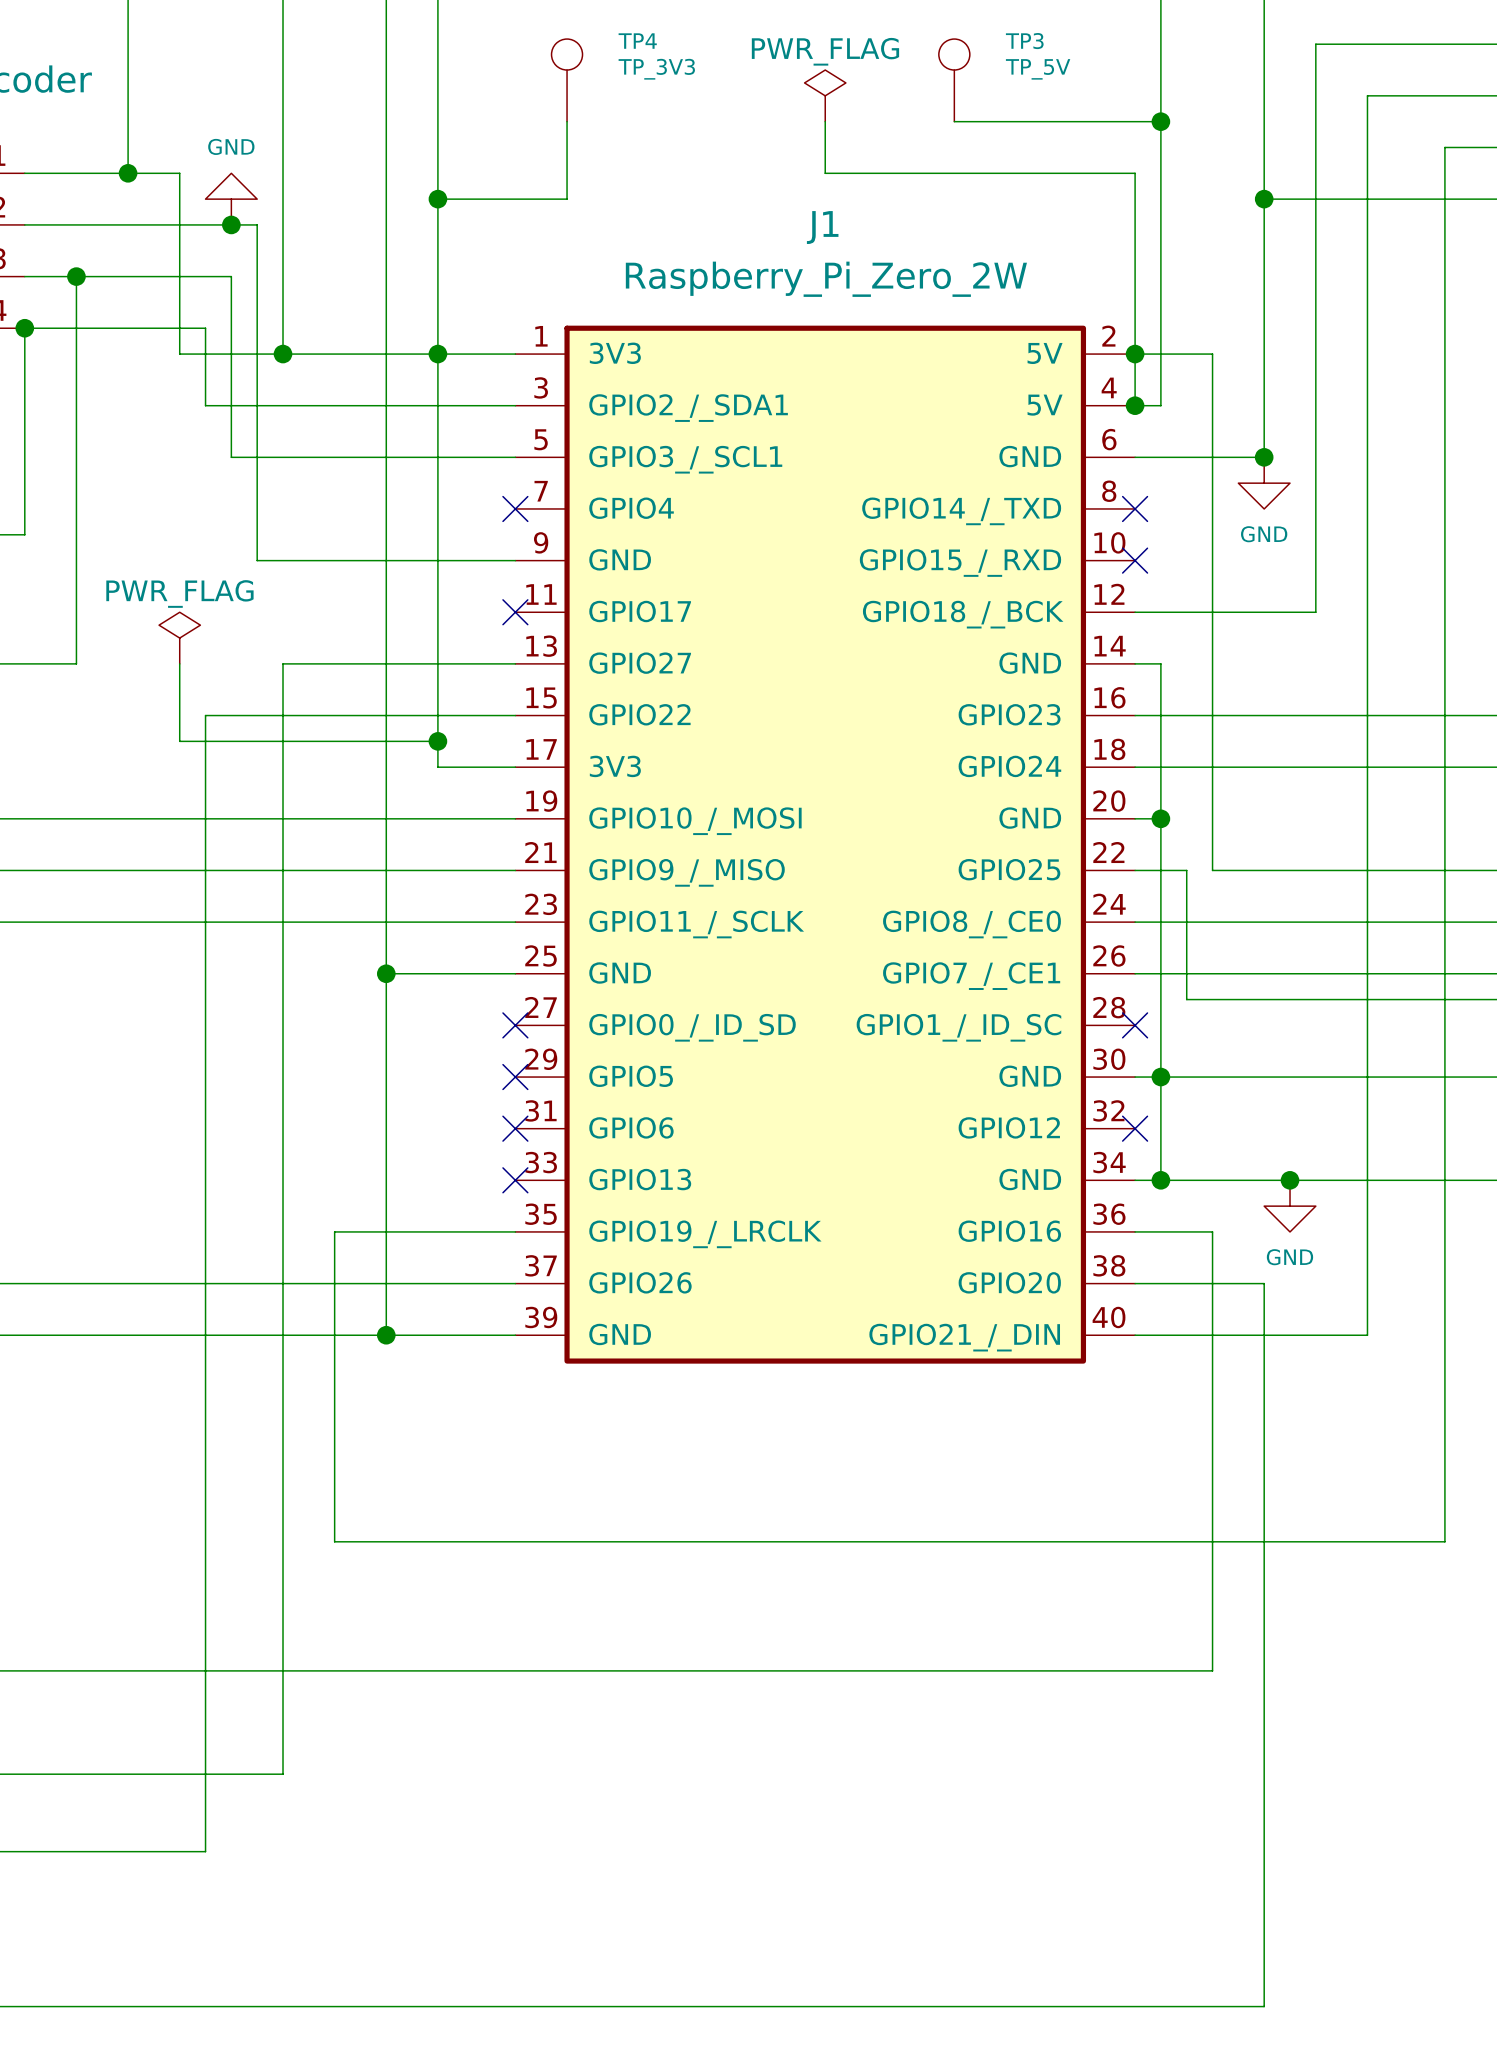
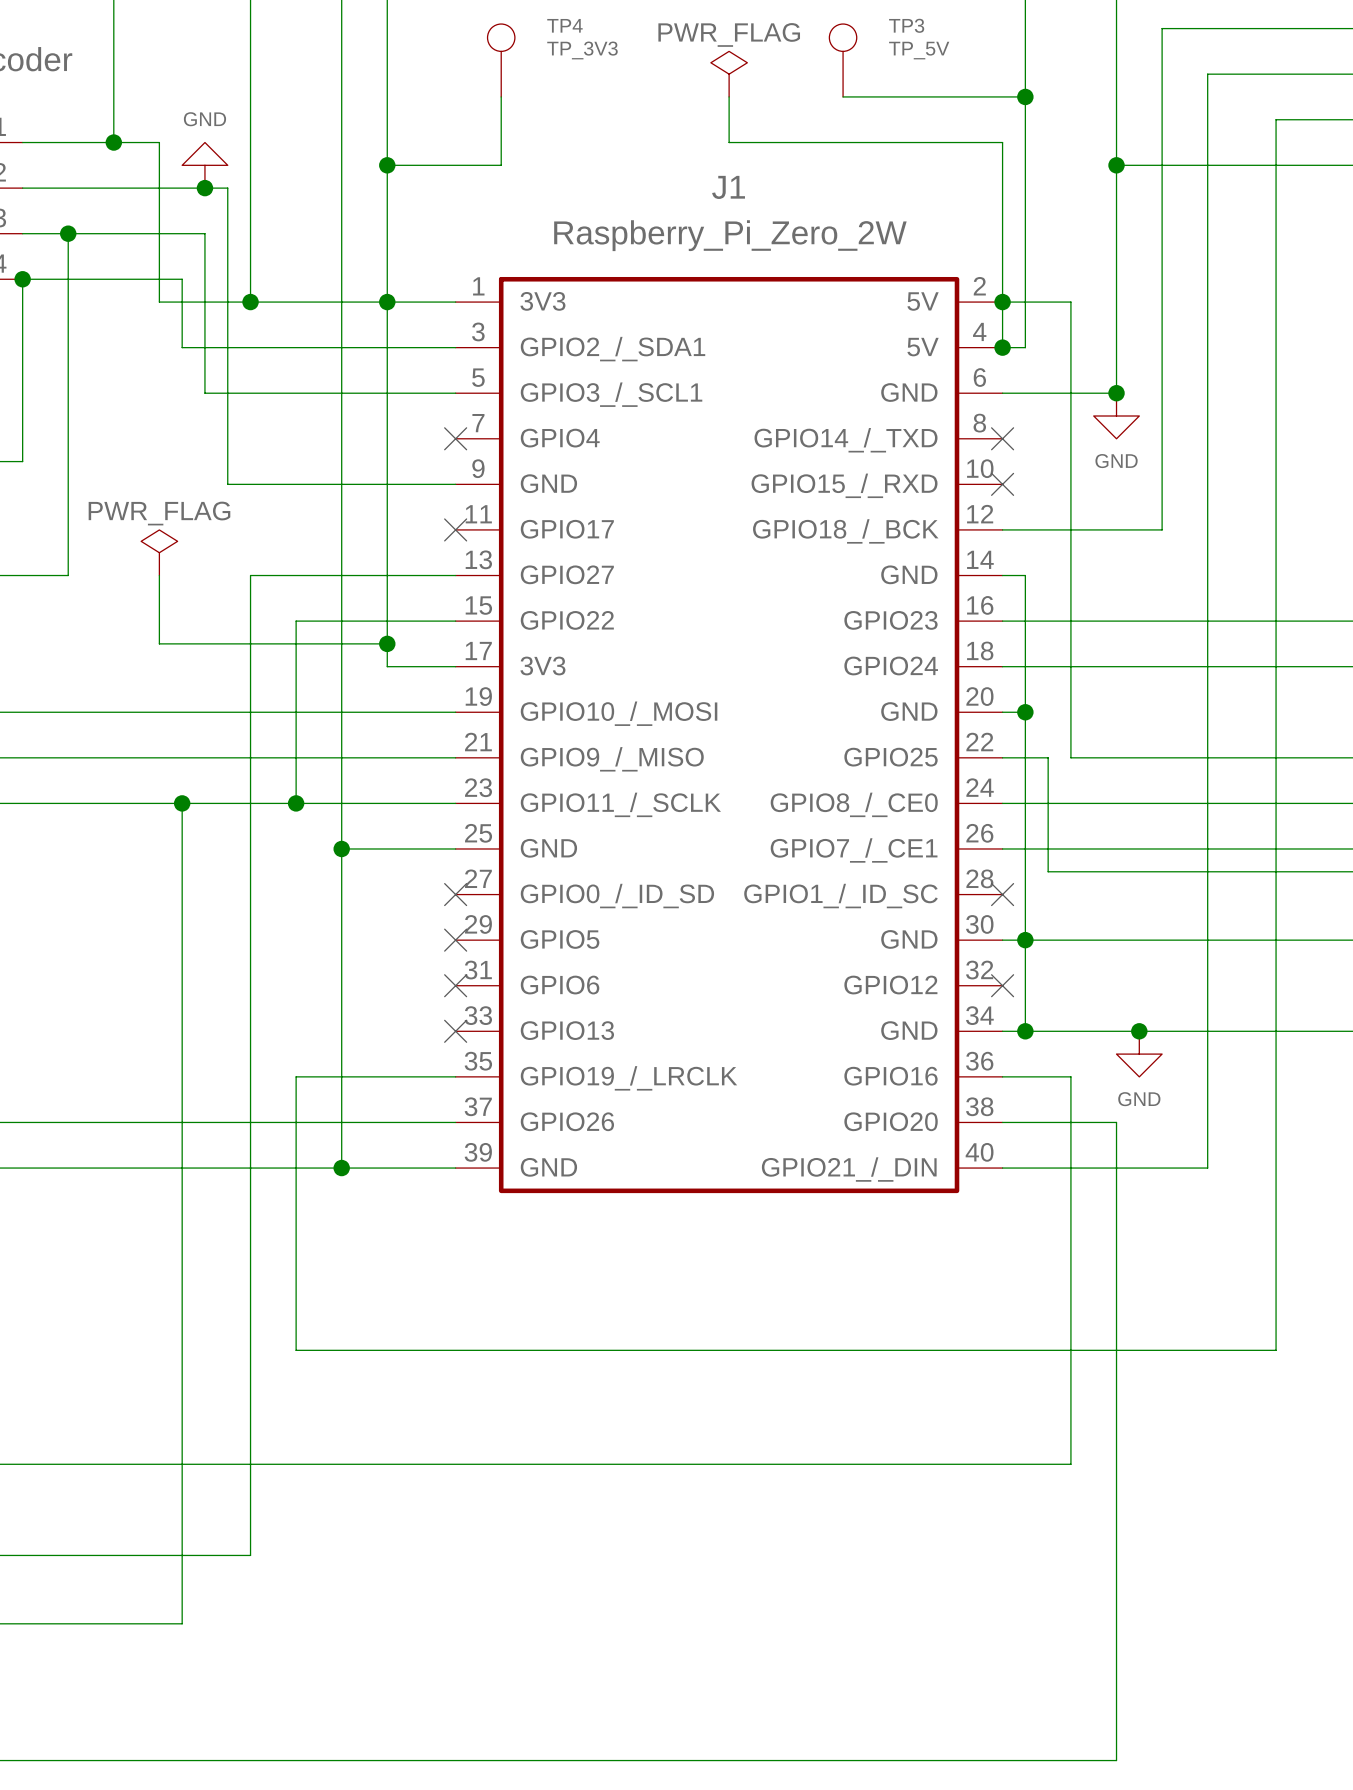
wire: (334, 715) (205, 715) (205, 922) -> (296, 621) (296, 803)
junction: none -> (182, 803)
junction: none -> (296, 803)

